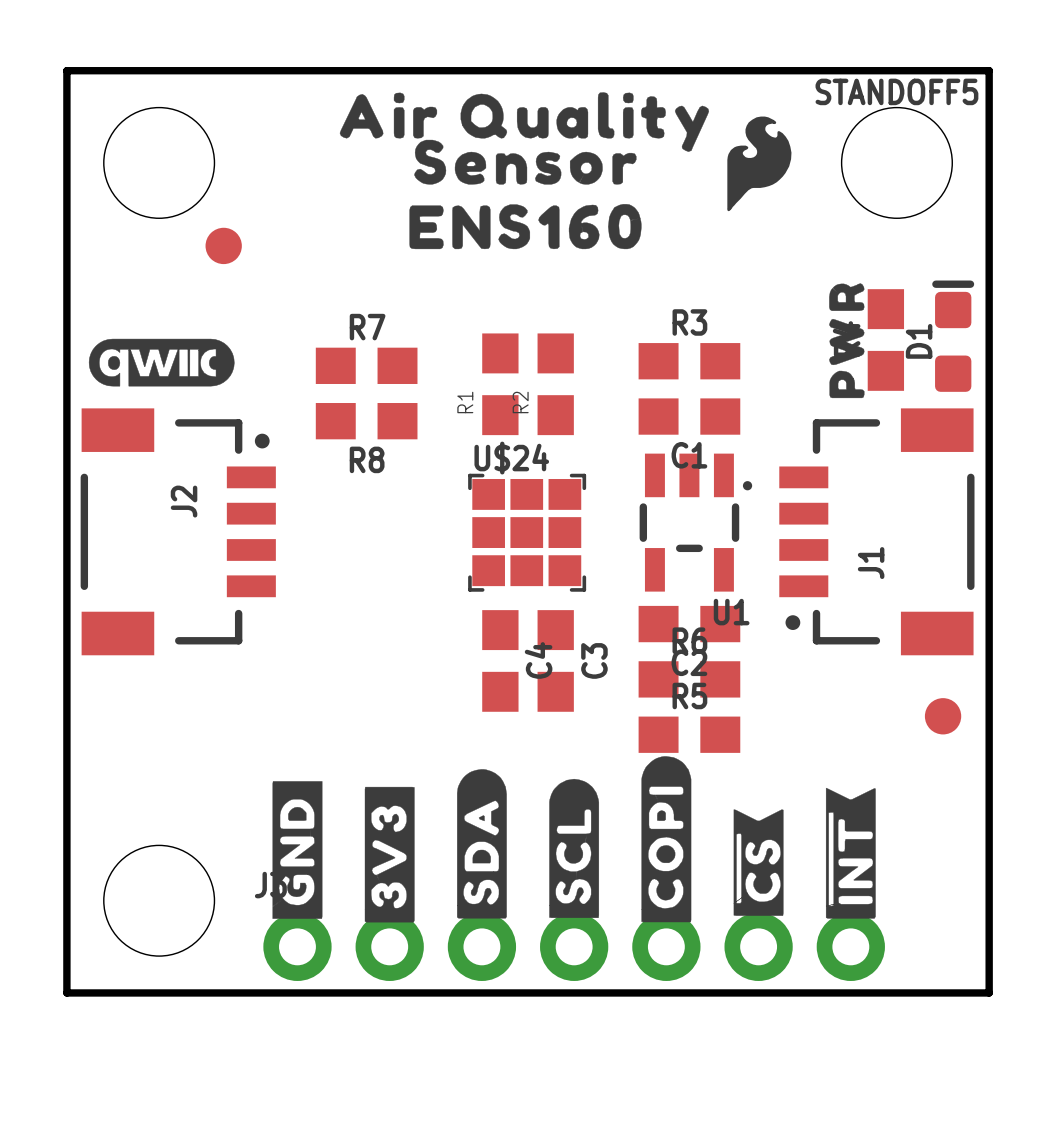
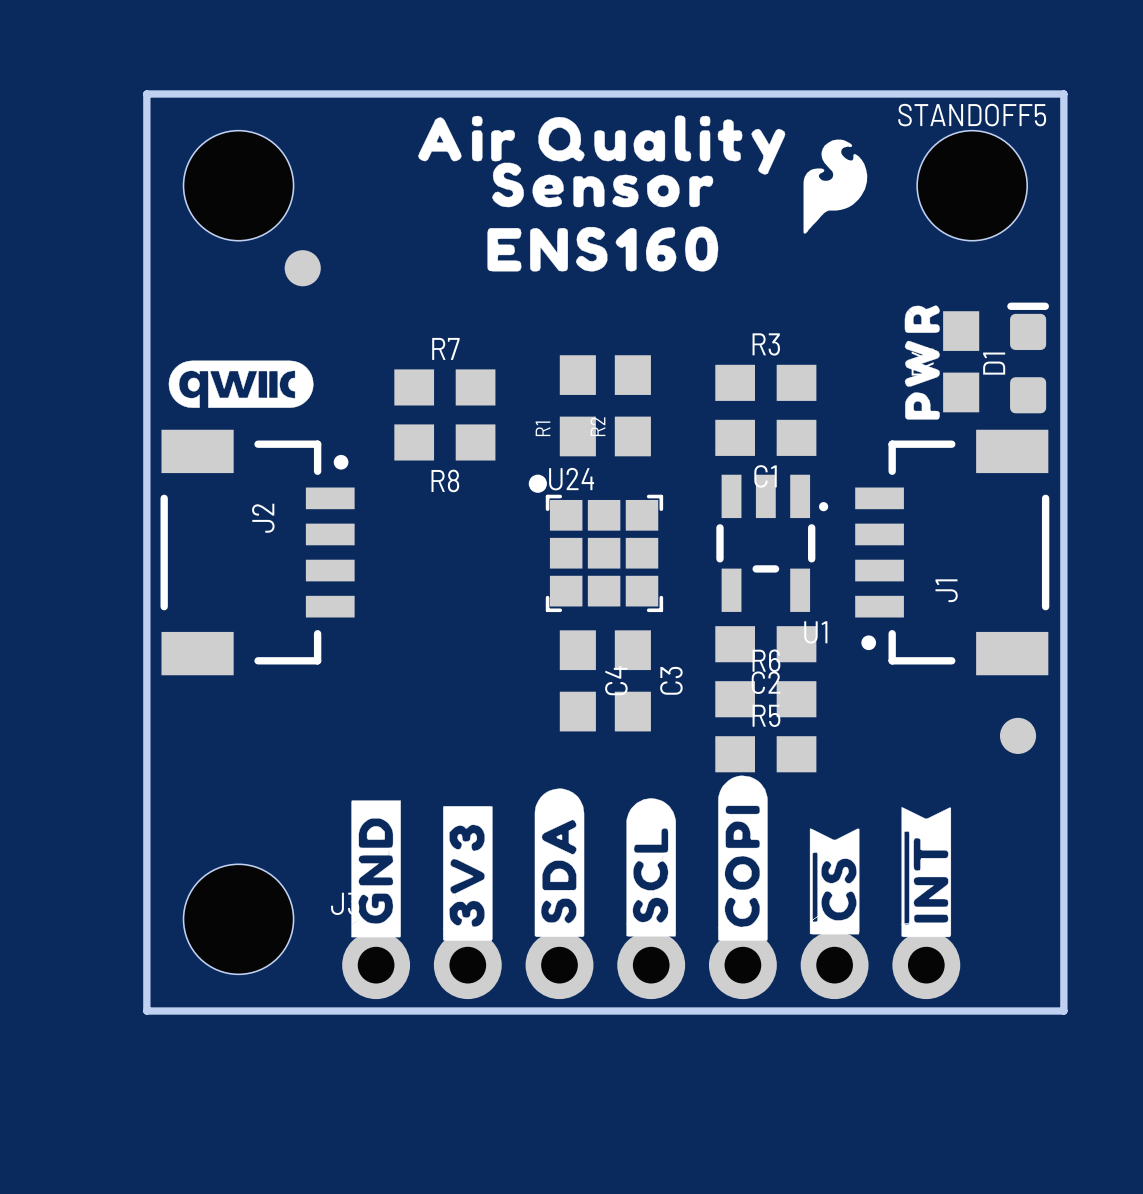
U24: none -> (595, 543)
U$24: (527, 532) -> none

